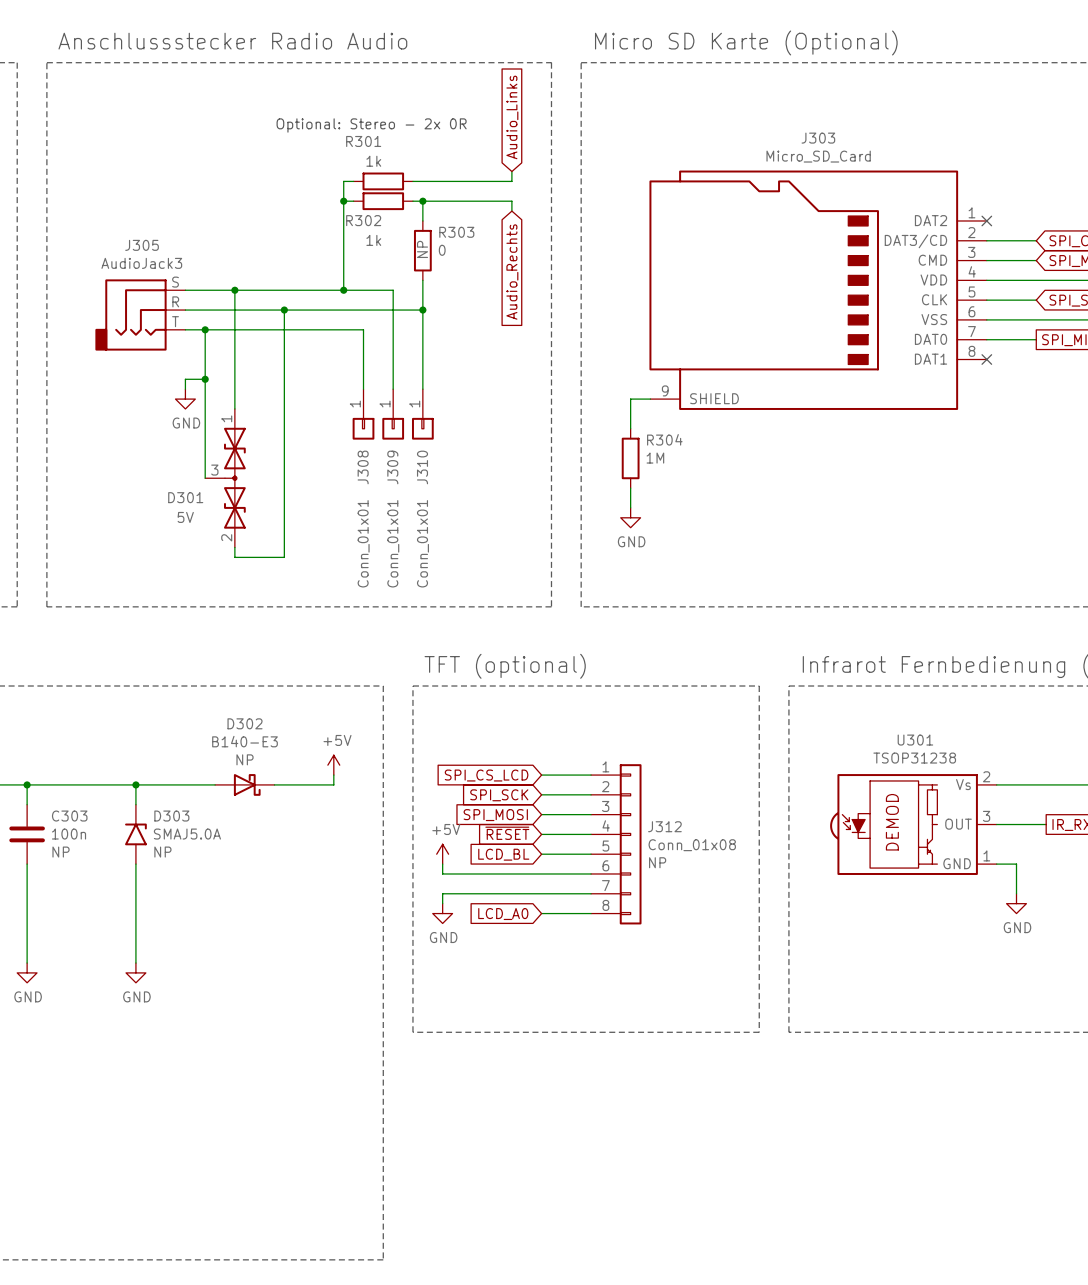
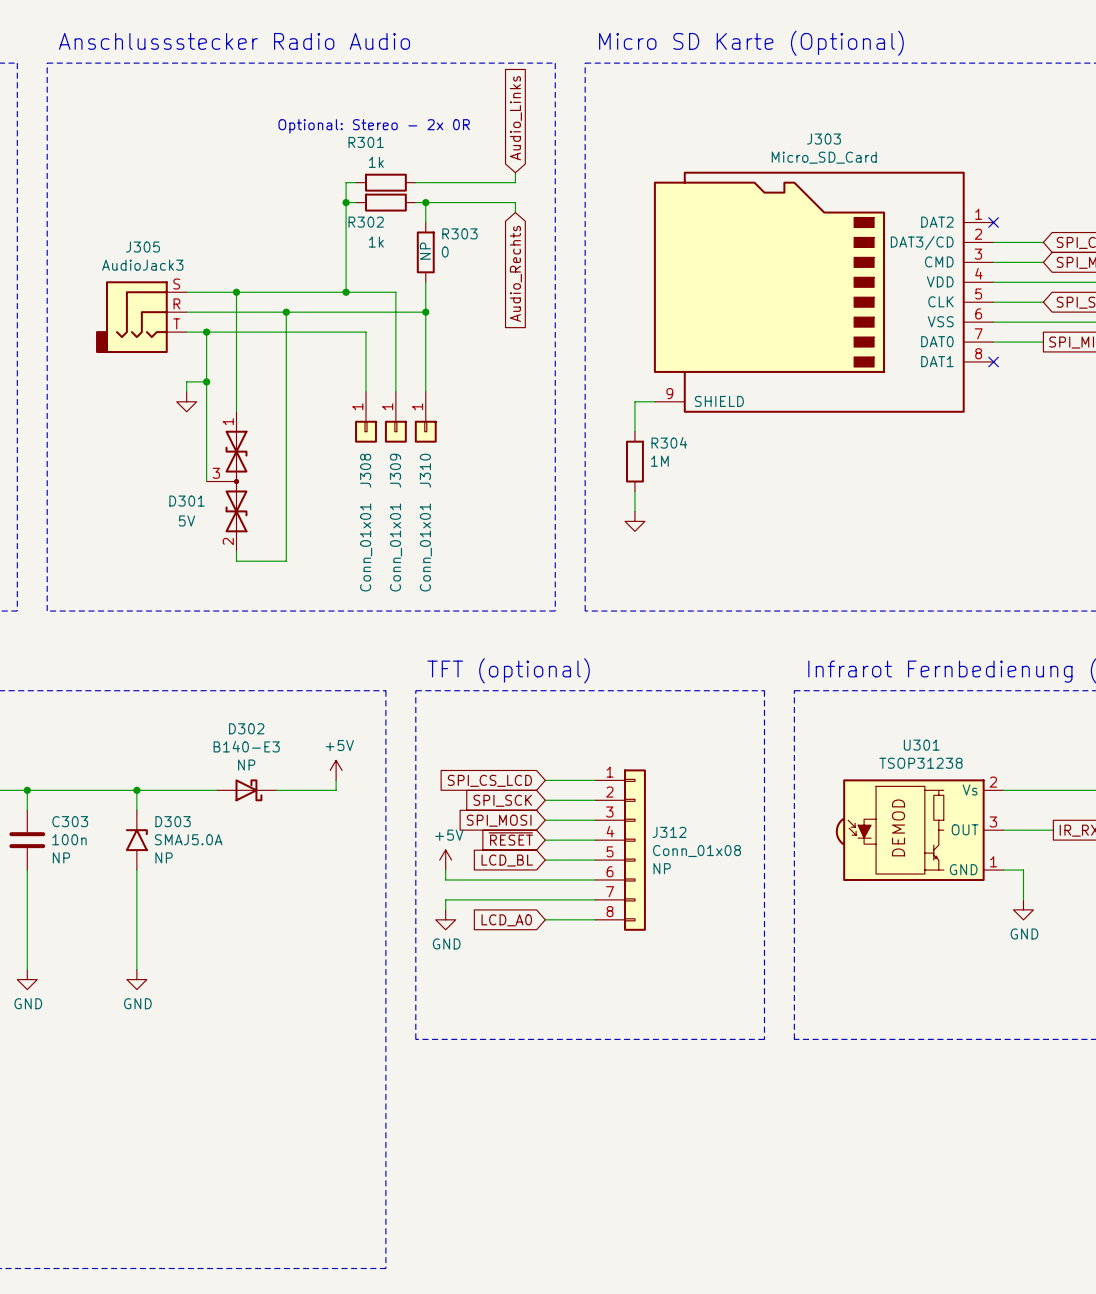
power symbol text: GND (186, 423) -> none
power symbol text: GND (631, 541) -> none

